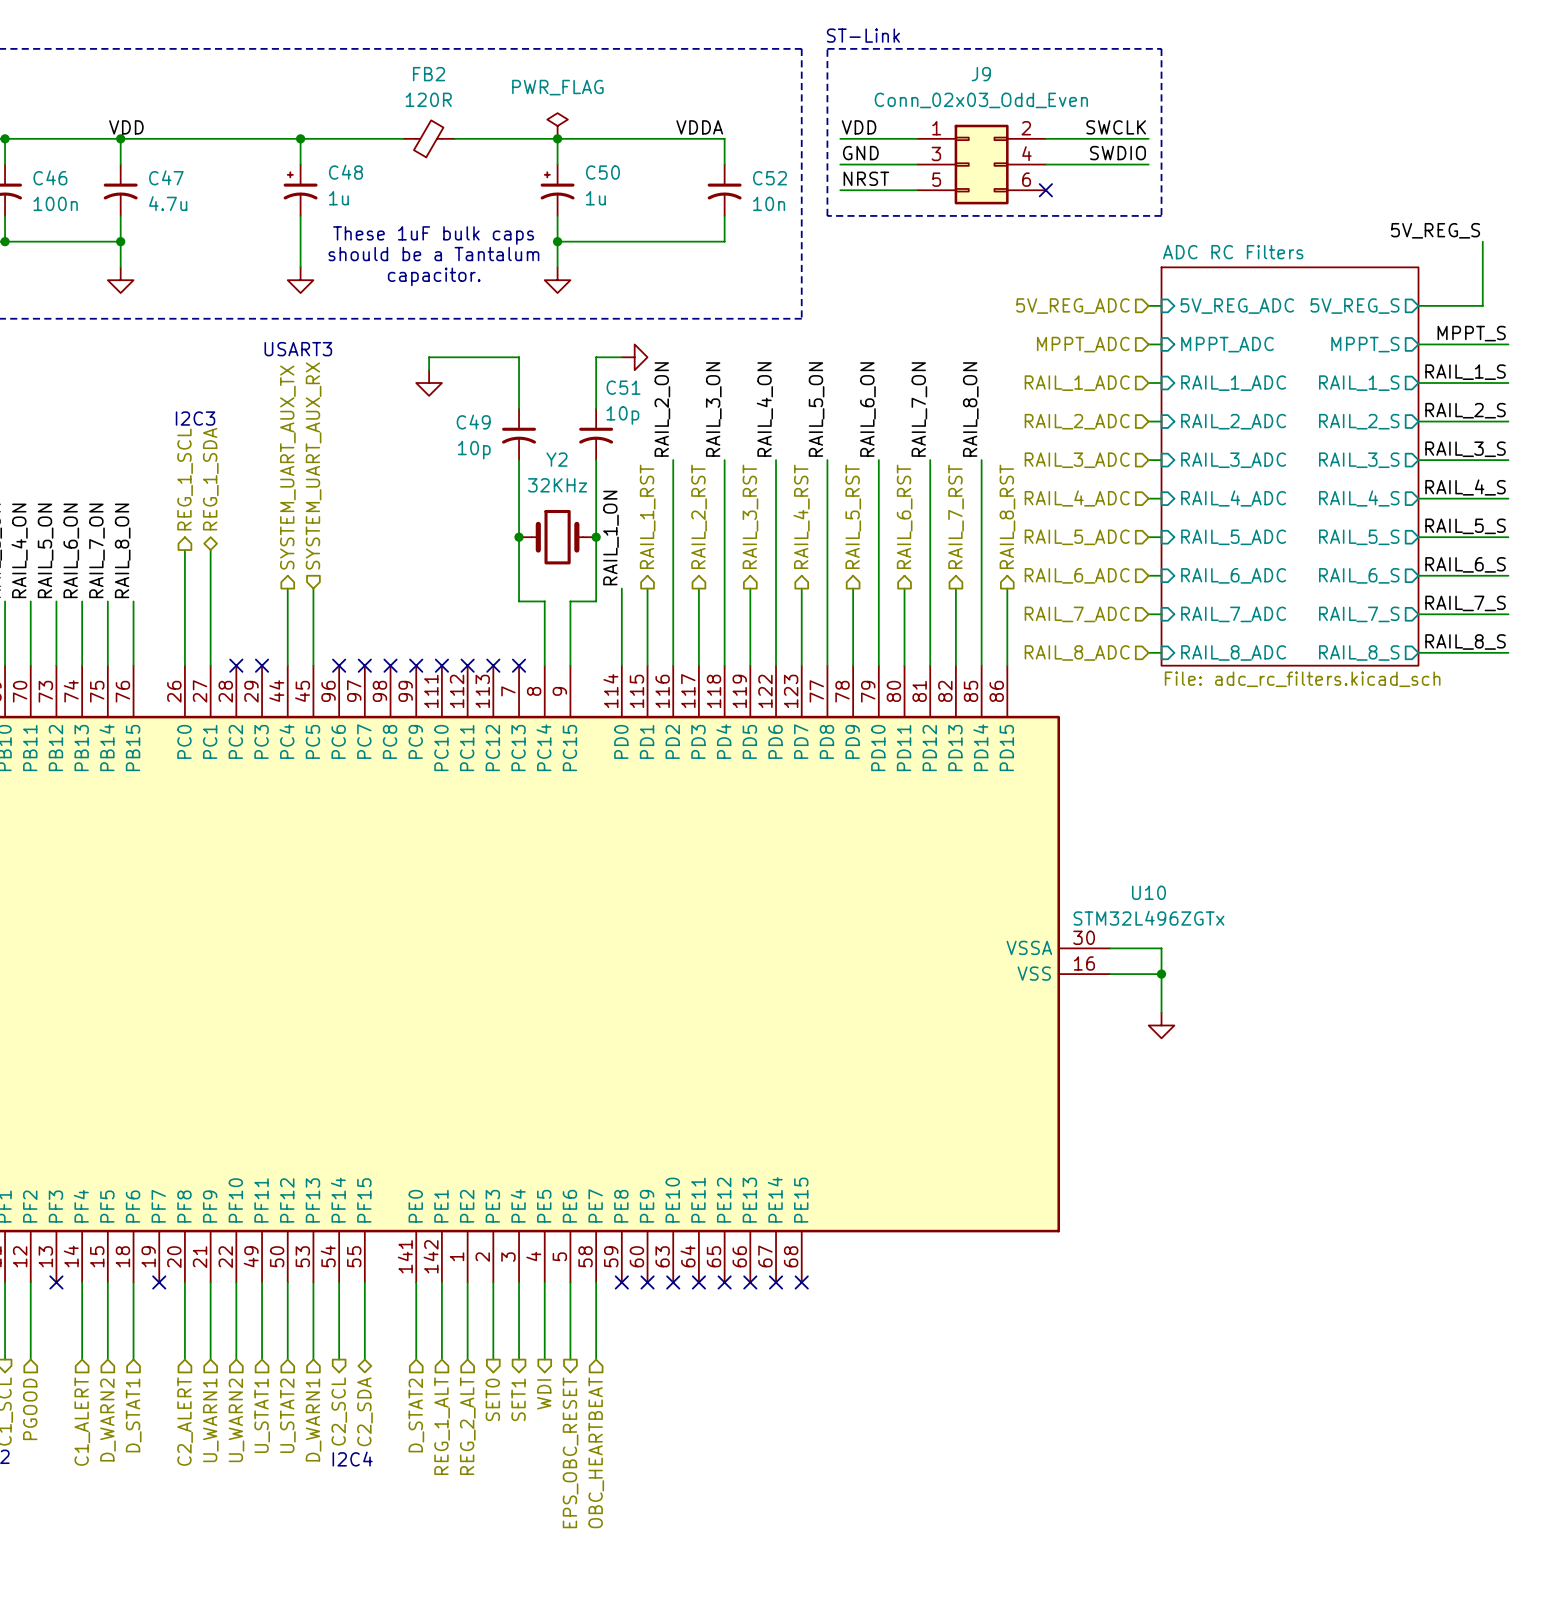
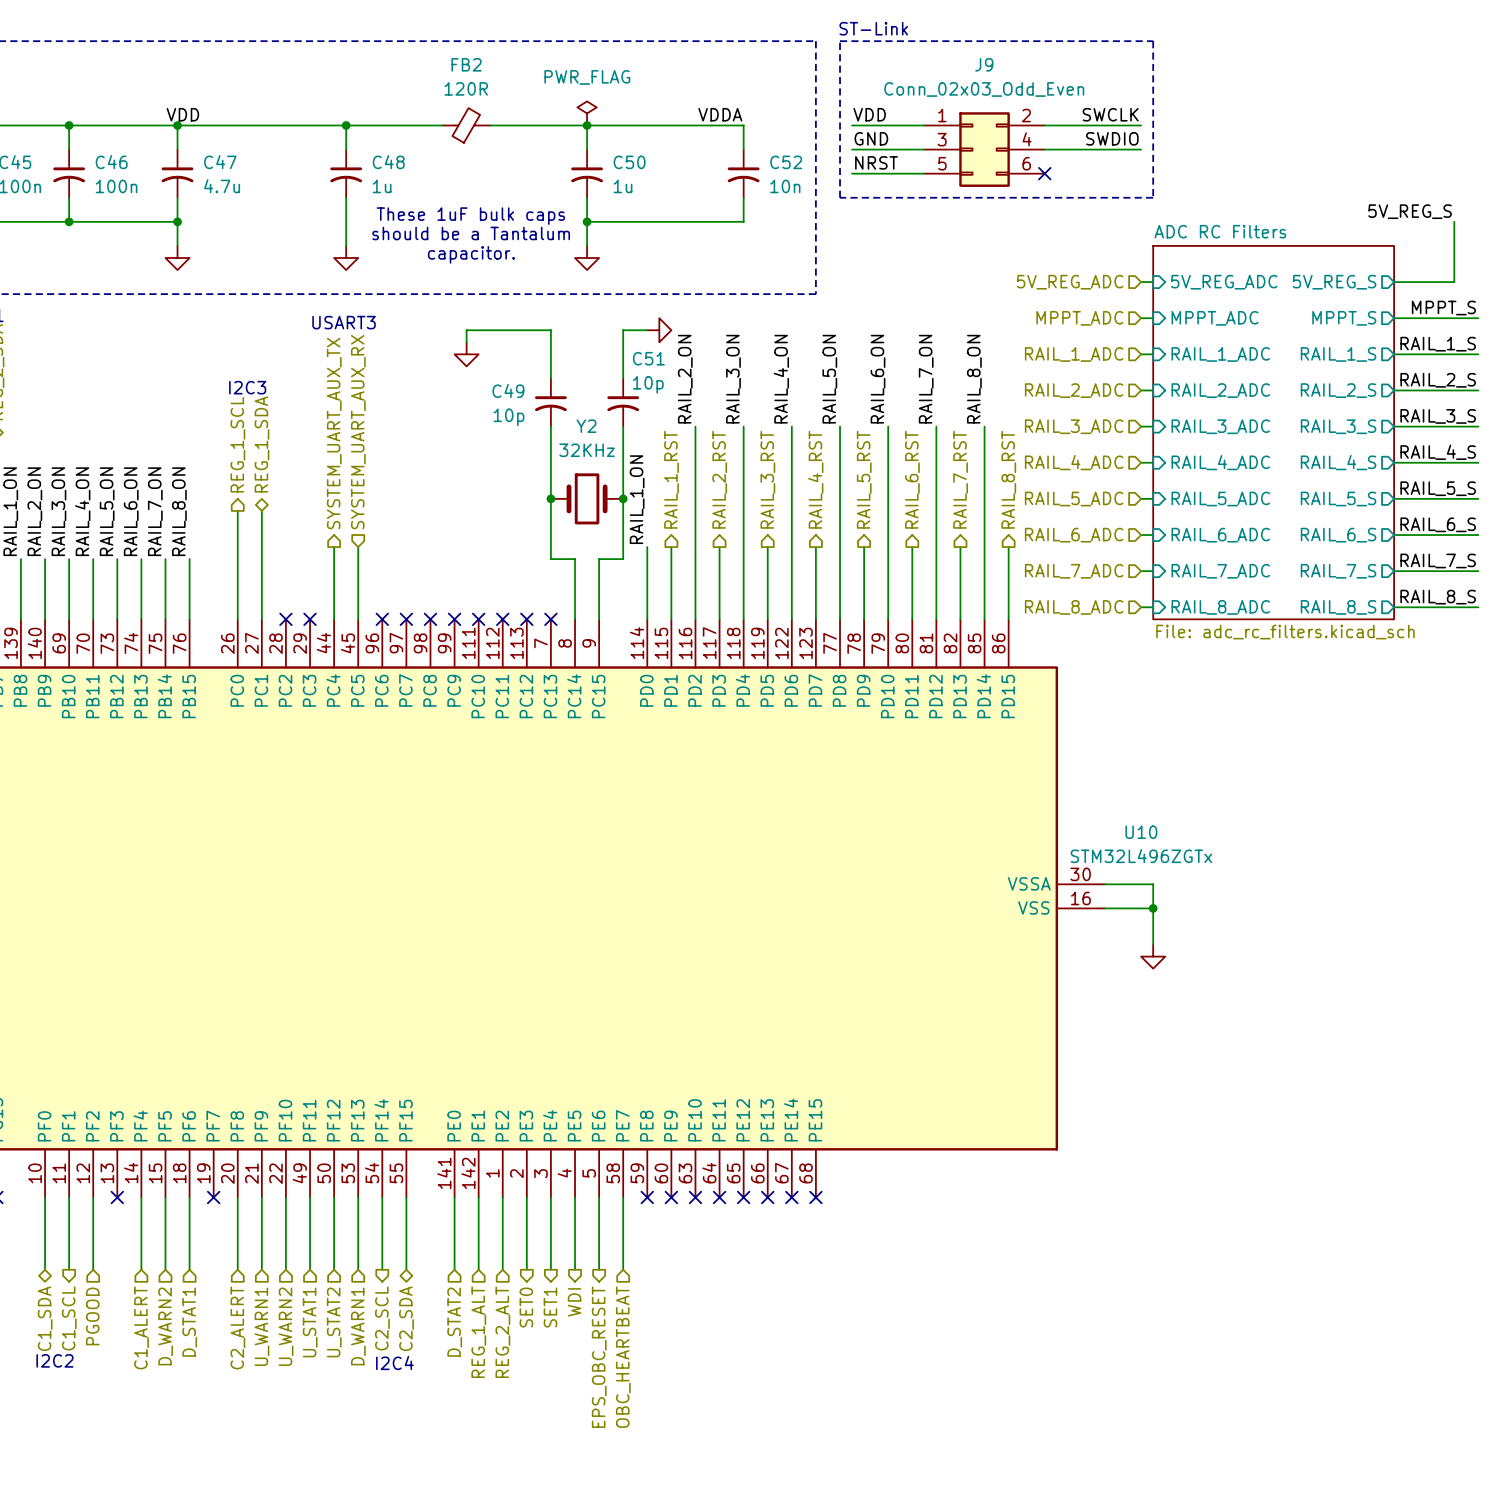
C48 symbol: [283, 164, 318, 216] -> [330, 149, 363, 198]
C50 symbol: [540, 164, 575, 216] -> [571, 149, 603, 198]

